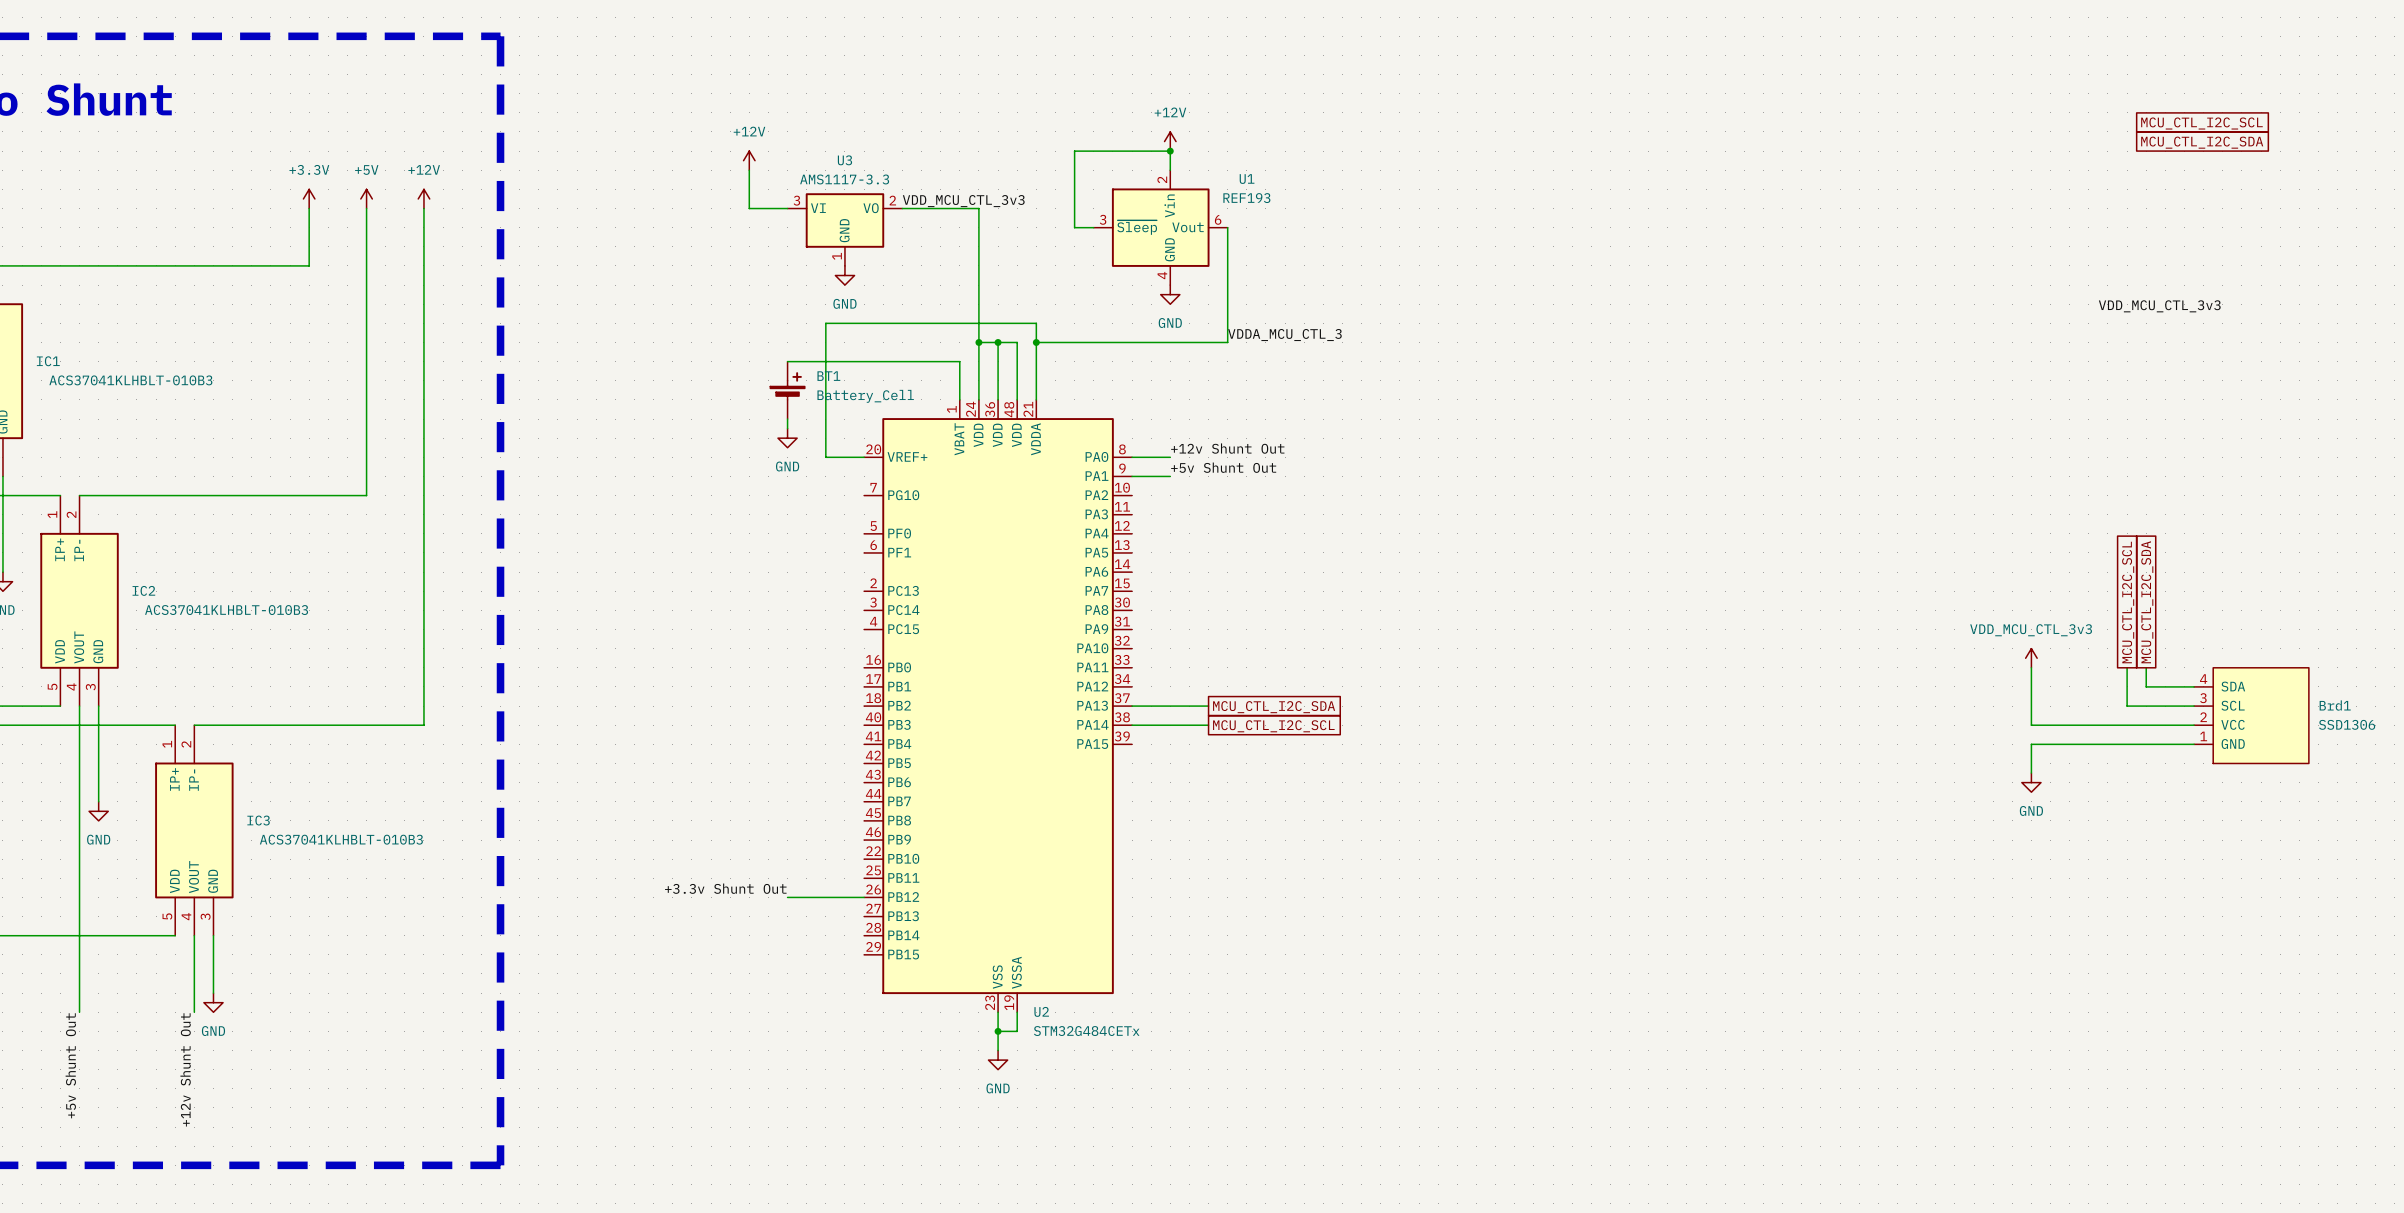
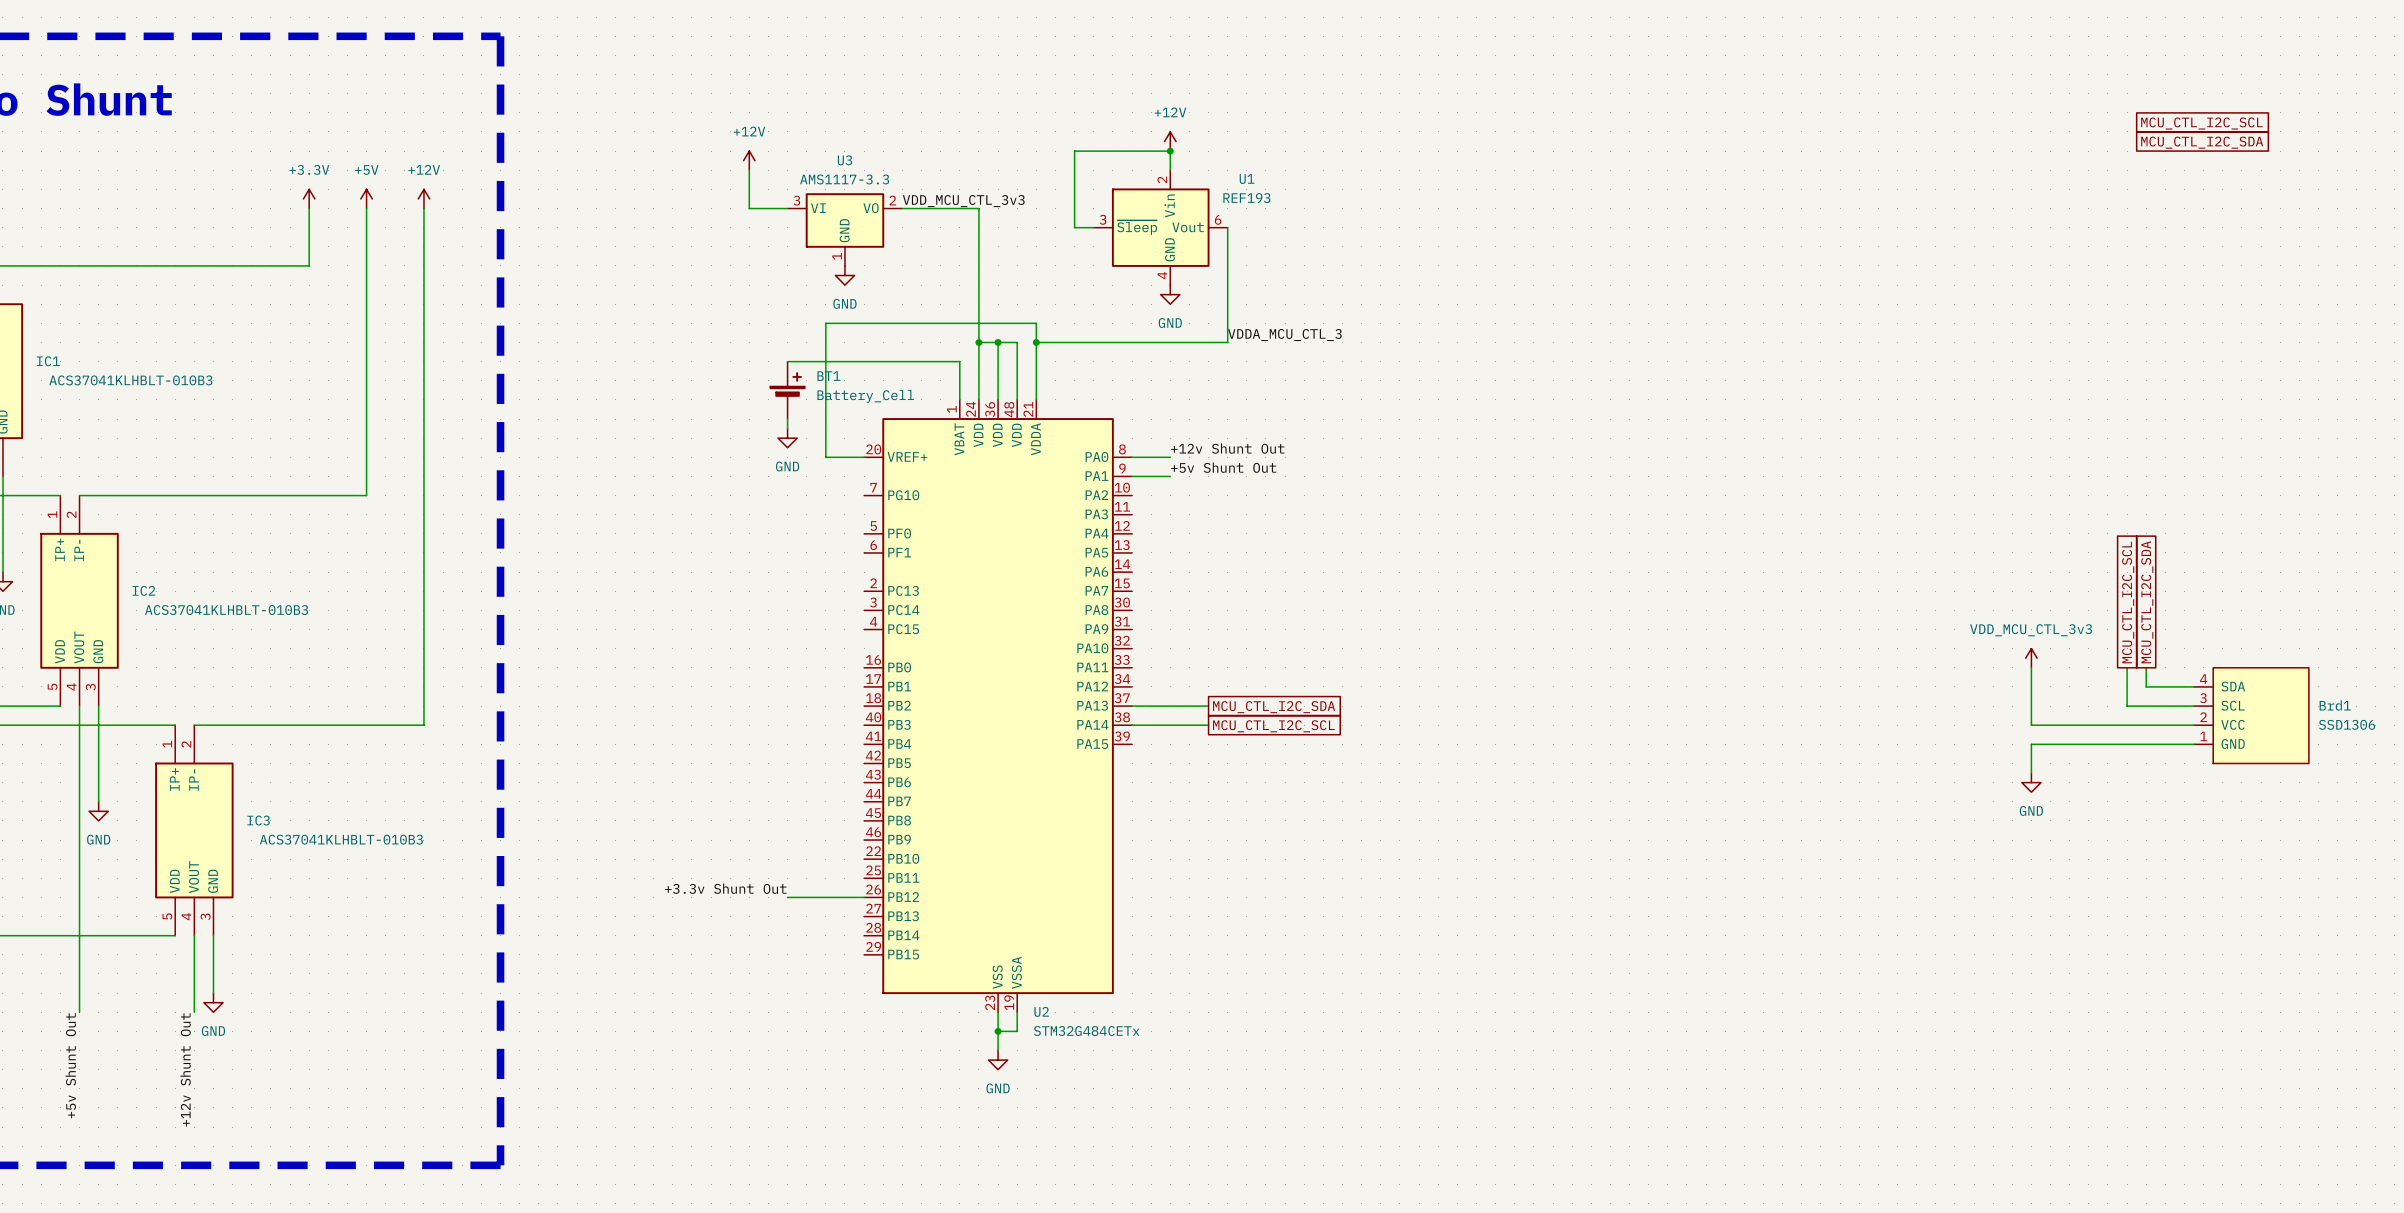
label: VDD_MCU_CTL_3v3 (2159, 306) -> none

